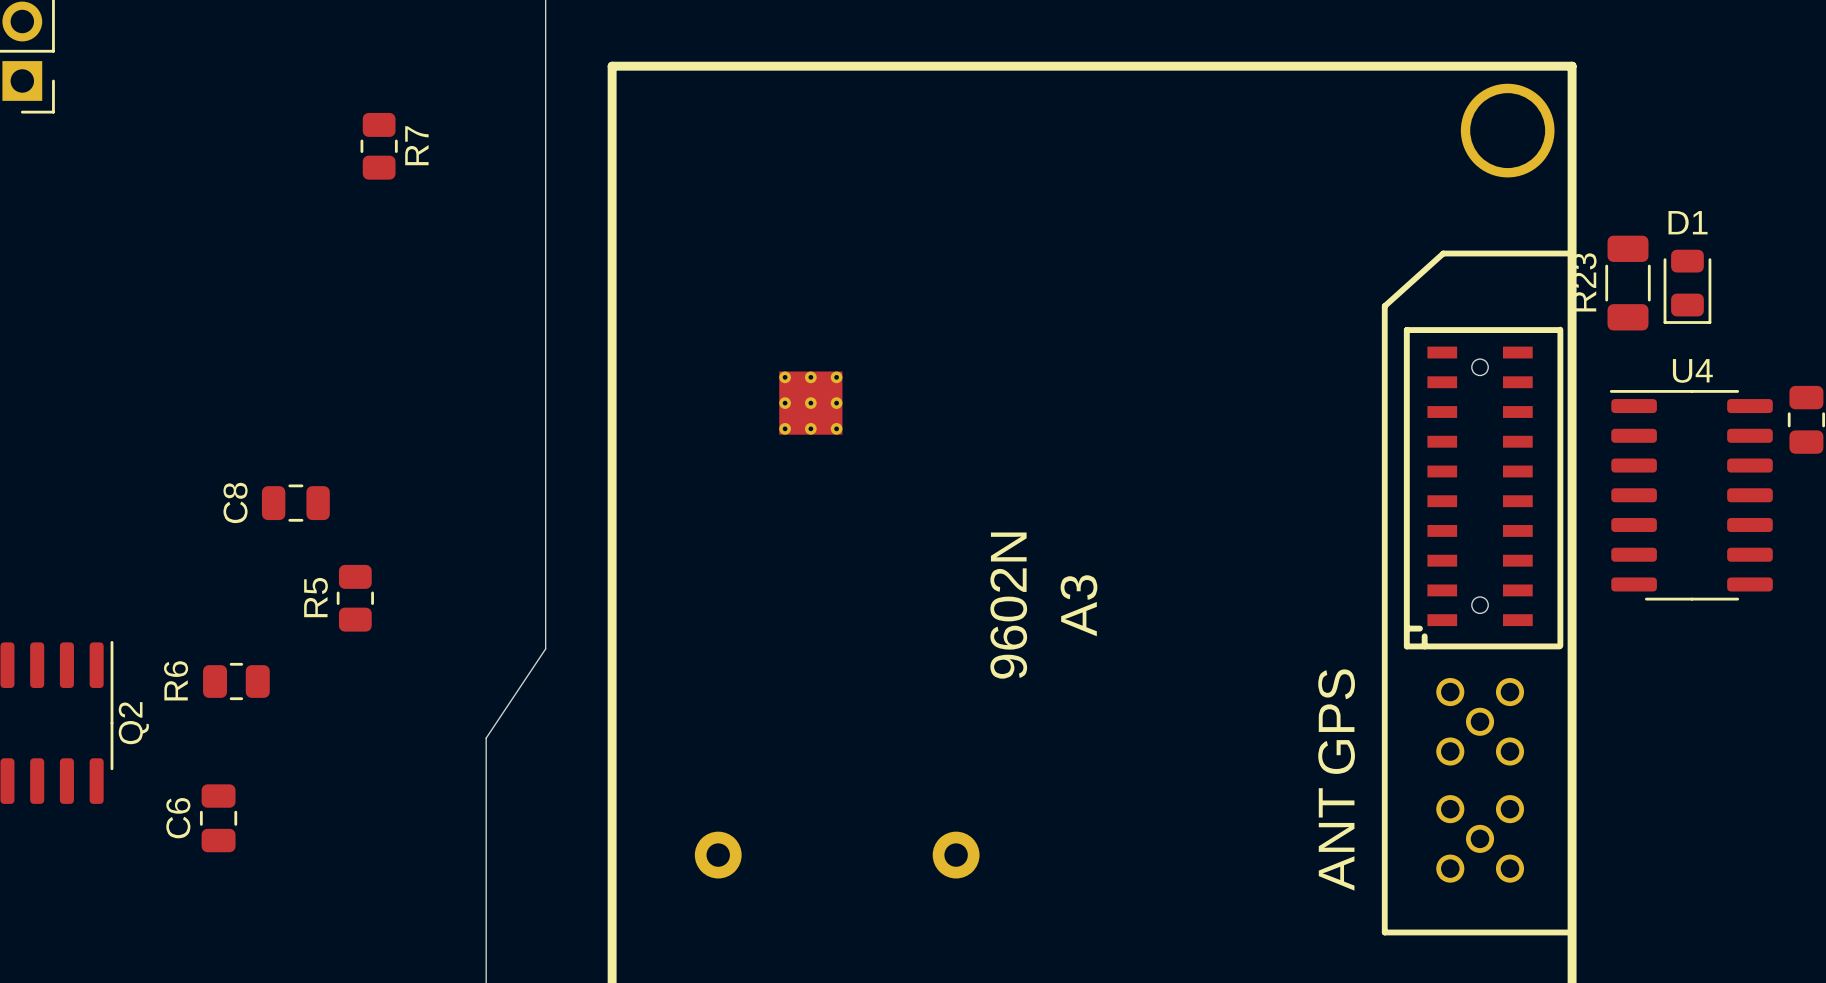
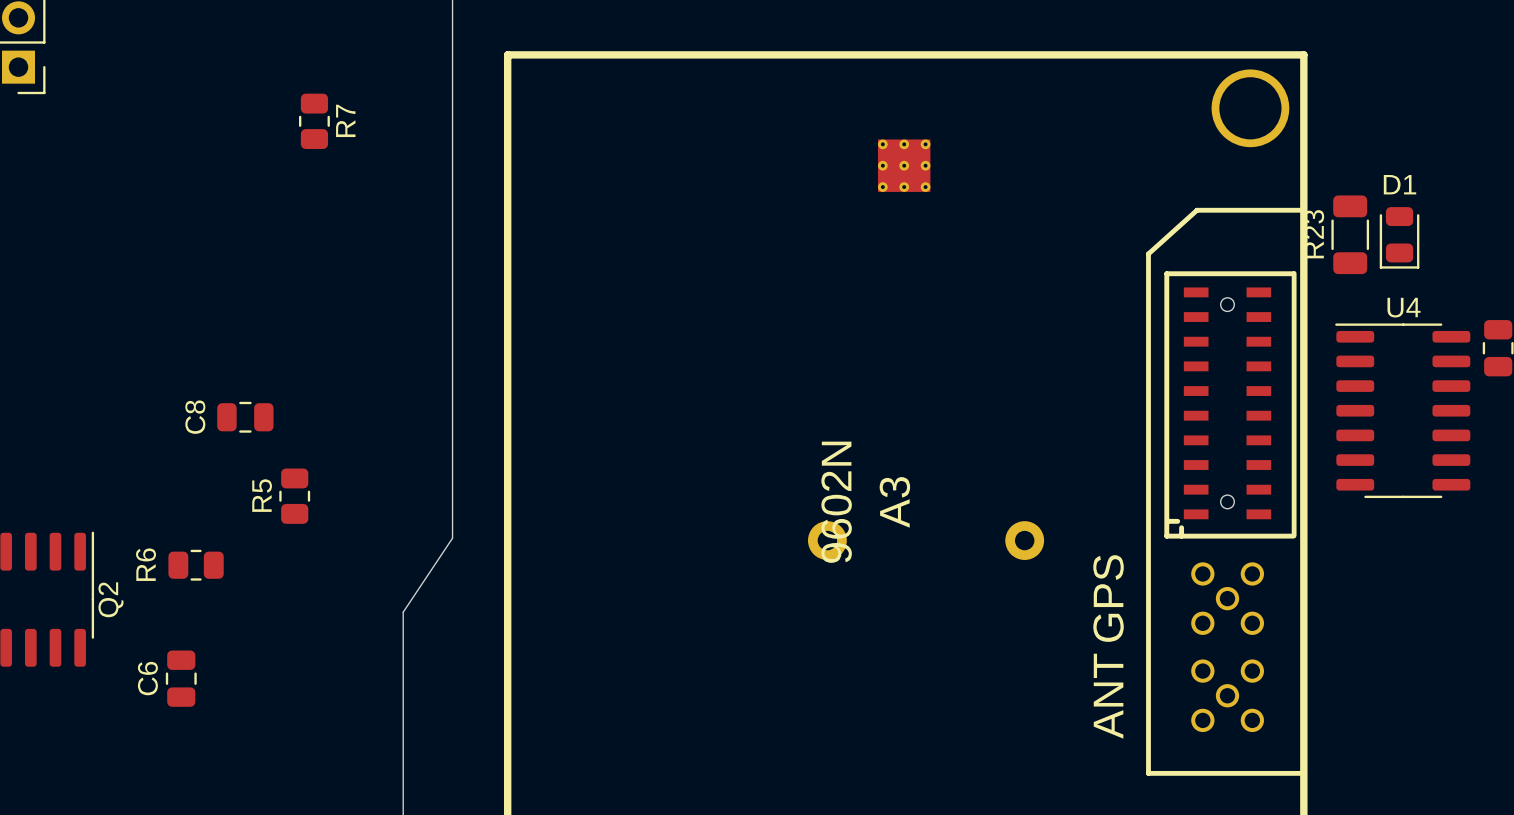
part position: (810, 403) -> (904, 165)
part: none -> (827, 540)
part: none -> (1024, 540)
part: (718, 855) -> none
part: (956, 855) -> none

